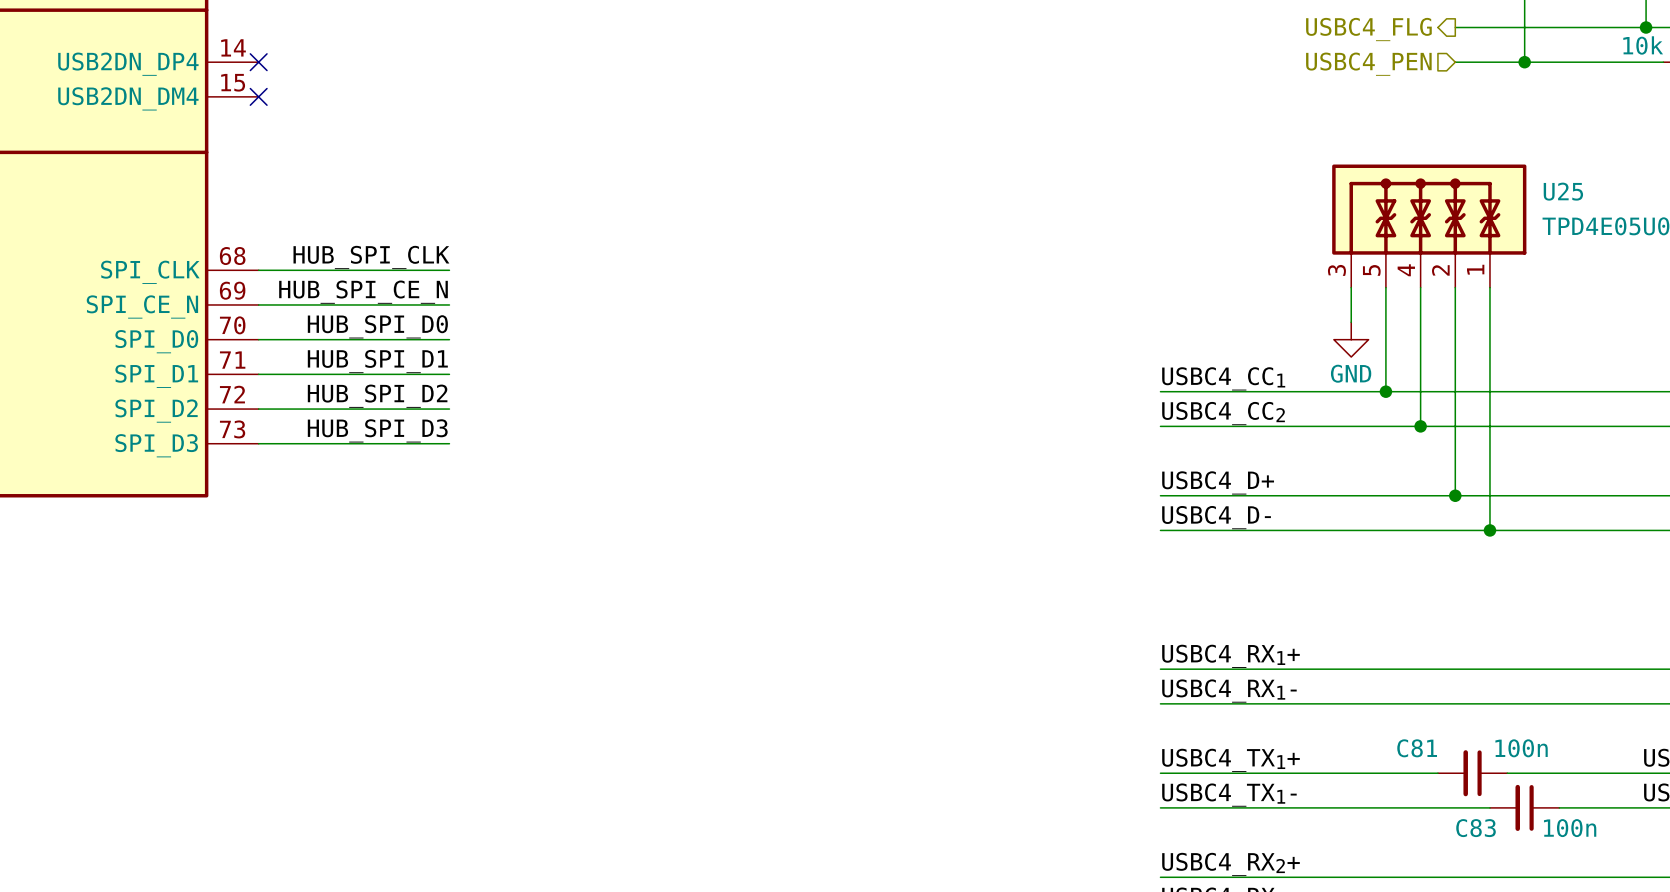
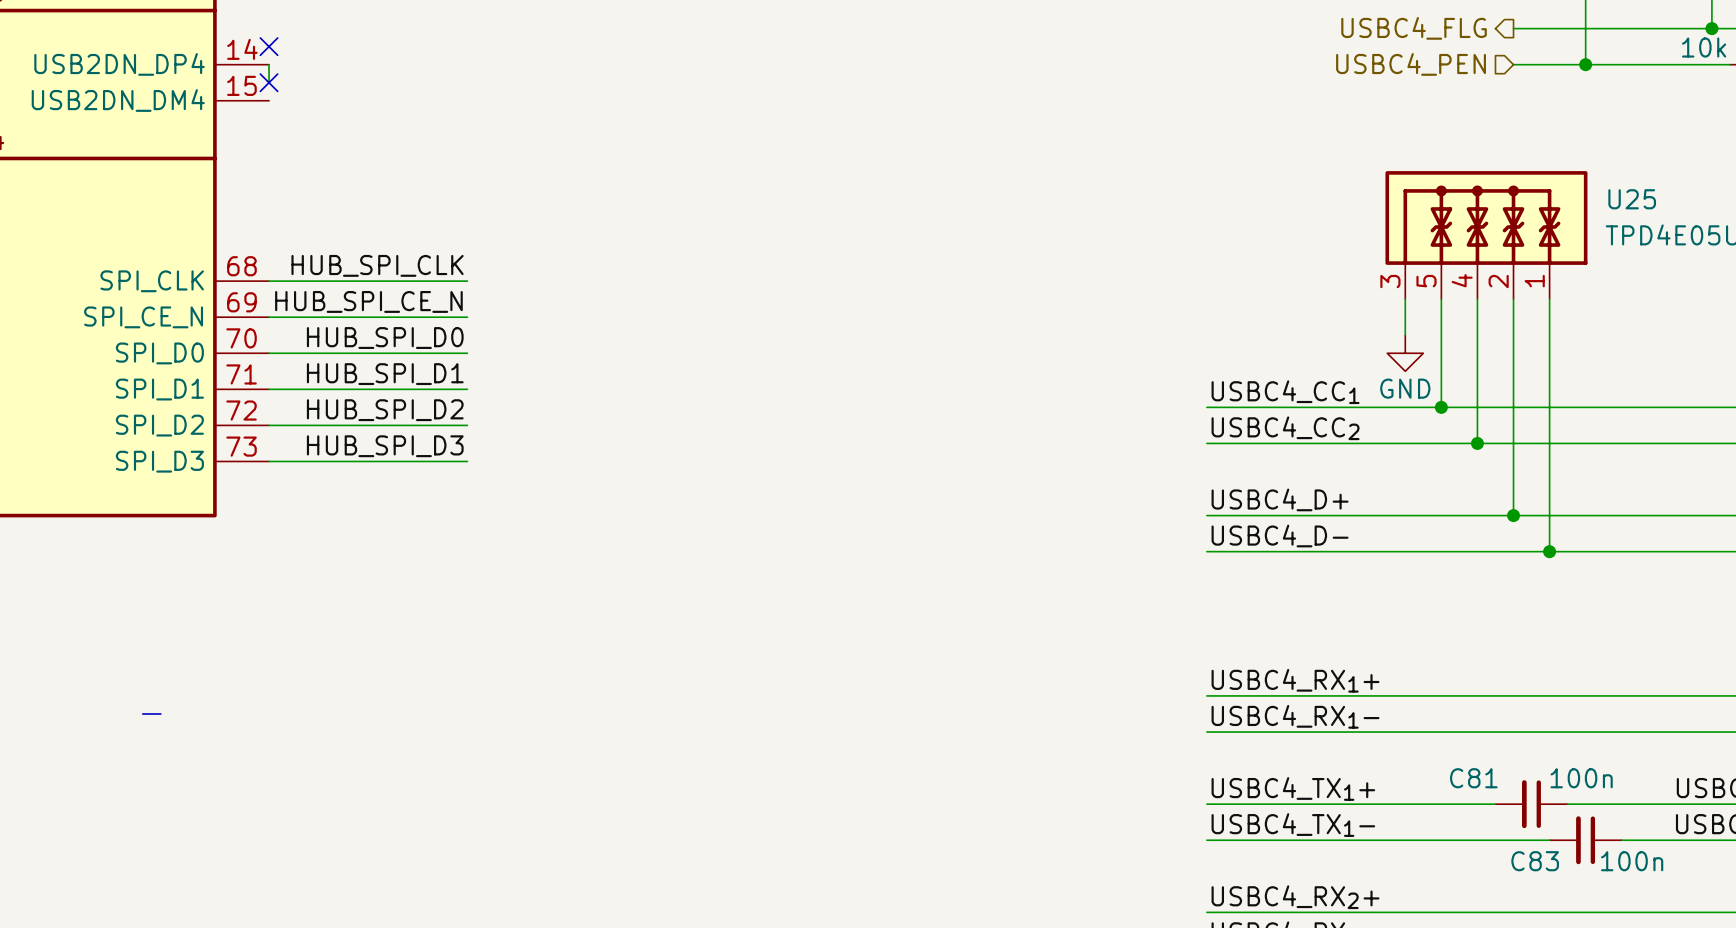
no-connect mark: none -> (269, 46)
wire: none -> (269, 64) (269, 82)
no-connect mark: (258, 62) -> none
no-connect mark: none -> (269, 82)
no-connect mark: (258, 96) -> none
line: none -> (142, 713) (160, 713)

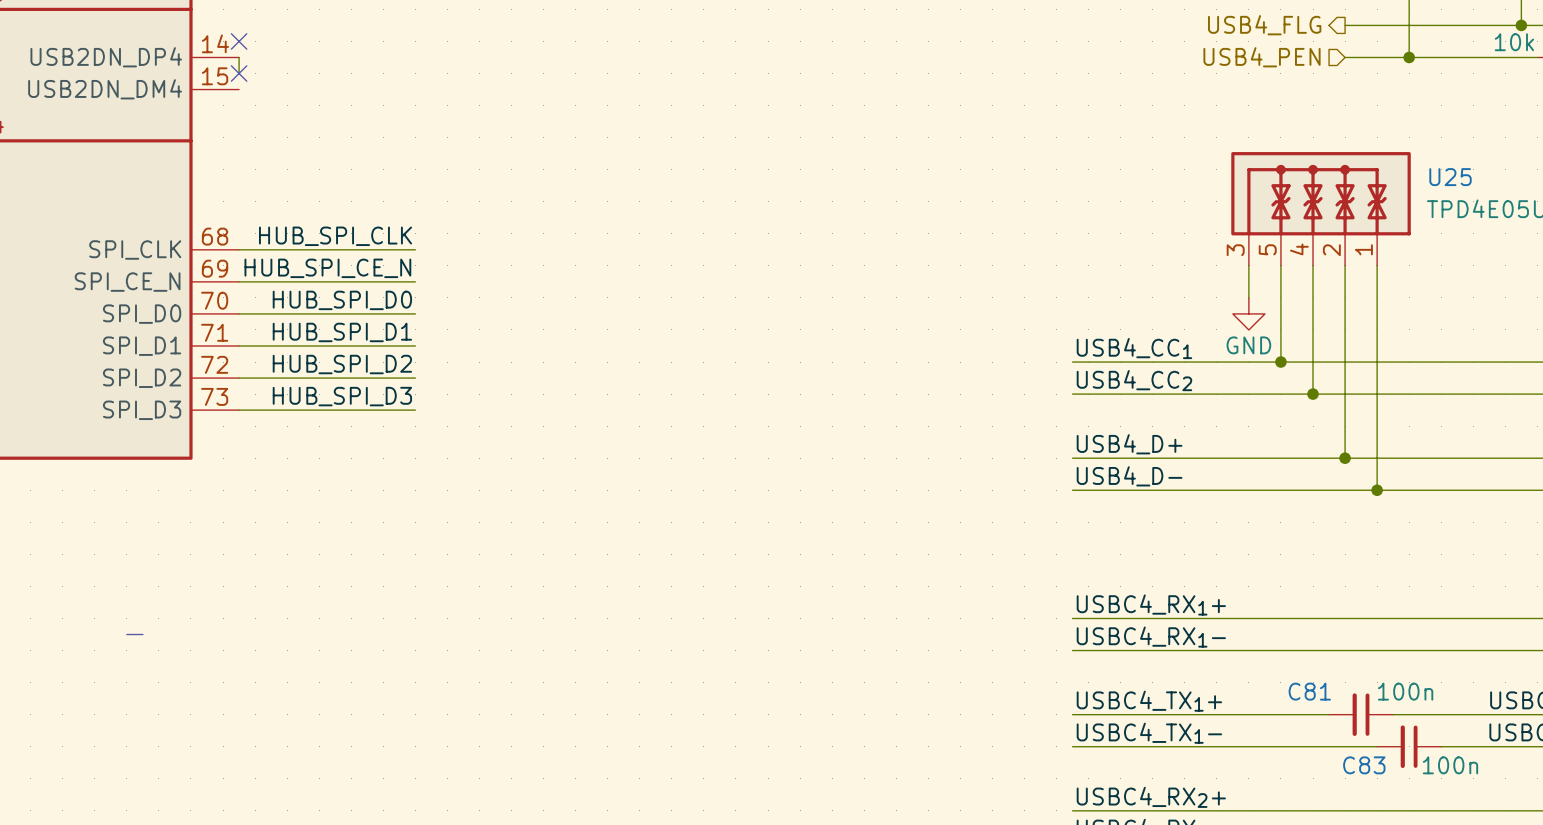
hierarchical label: USBC4_FLG (1414, 28) -> USB4_FLG (1264, 25)
hierarchical label: USBC4_PEN (1411, 64) -> USB4_PEN (1262, 57)
label: USBC4_CC1 (1285, 392) -> USB4_CC1 (1134, 348)
label: USBC4_CC2 (1285, 428) -> USB4_CC2 (1134, 380)
label: USBC4_D+ (1280, 499) -> USB4_D+ (1129, 444)
label: USBC4_D- (1280, 535) -> USB4_D- (1129, 476)

